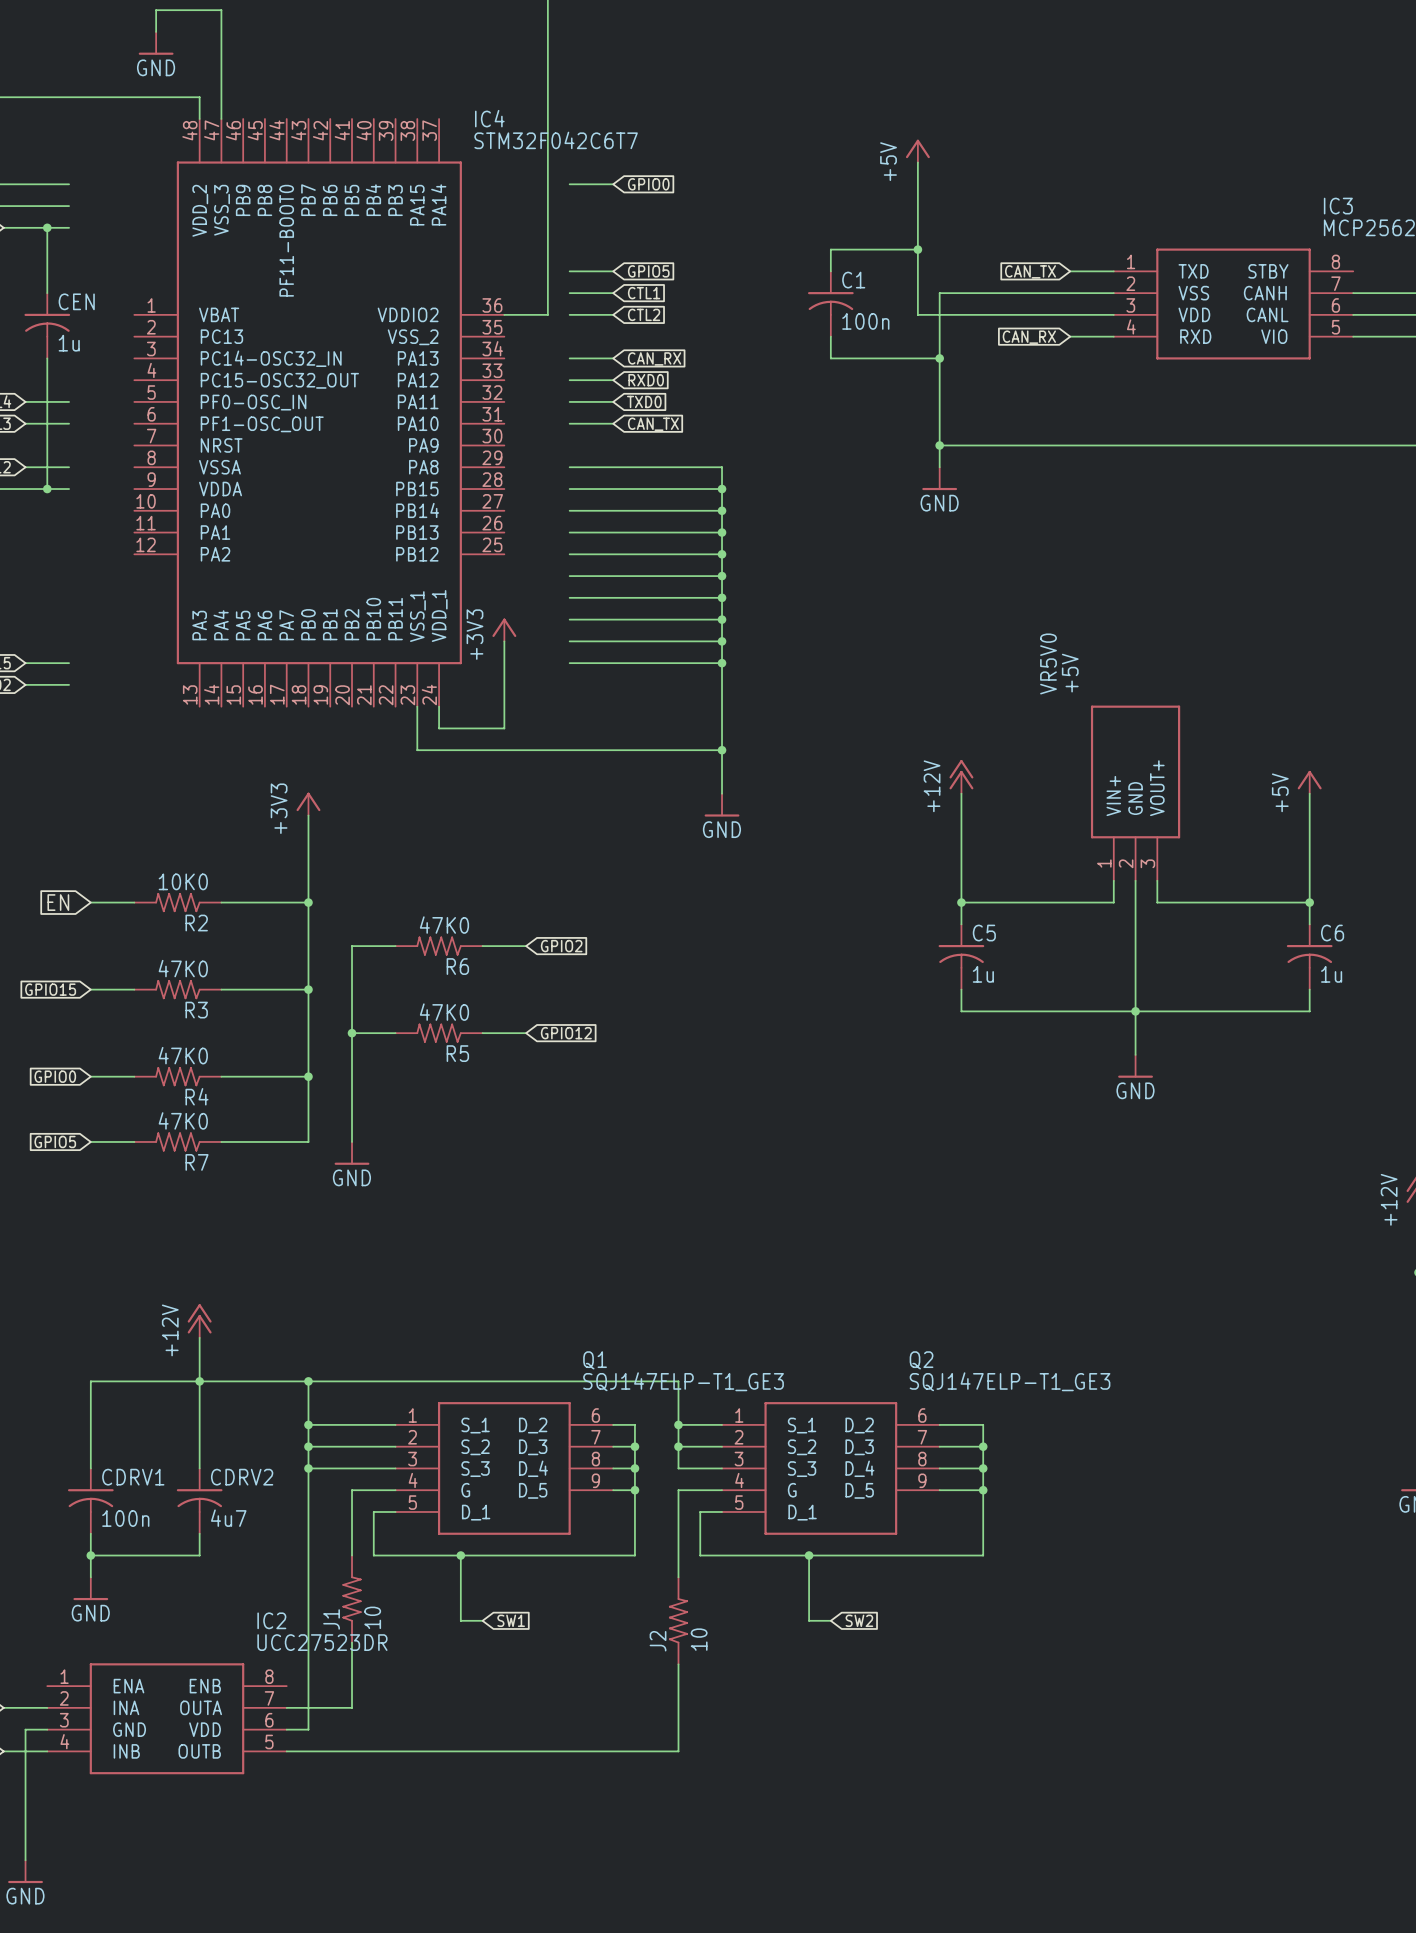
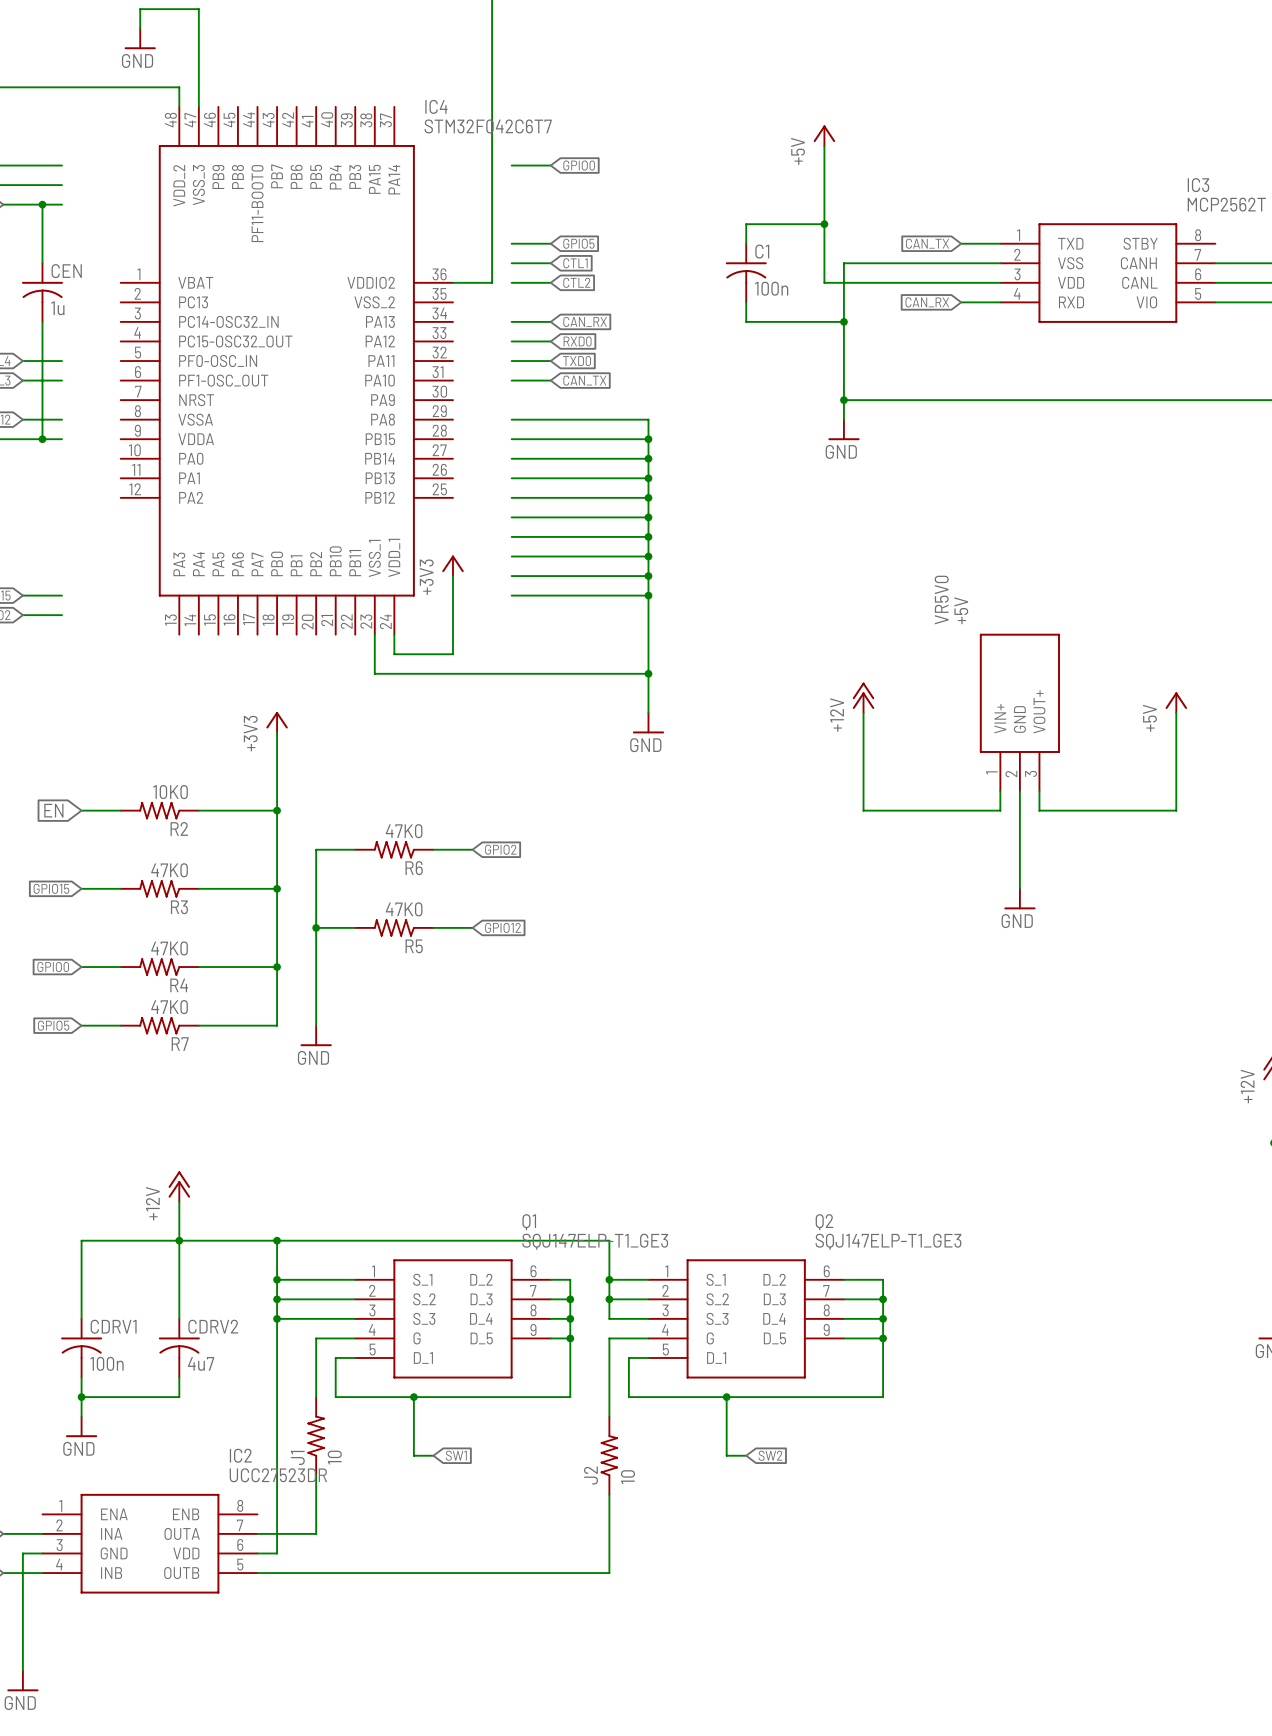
wire: (961, 902) (961, 924) -> none
junction: (961, 902) -> none
wire: (1309, 902) (1309, 924) -> none
junction: (1309, 902) -> none
C5: 1u (961, 956) -> none
C6: 1u (1309, 956) -> none
wire: (961, 989) (961, 1011) (1309, 1011) (1309, 989) -> none
wire: (1135, 989) (1135, 1054) -> none
junction: (1135, 1011) -> none
power symbol position: GND (1135, 1066) -> GND (1019, 899)

